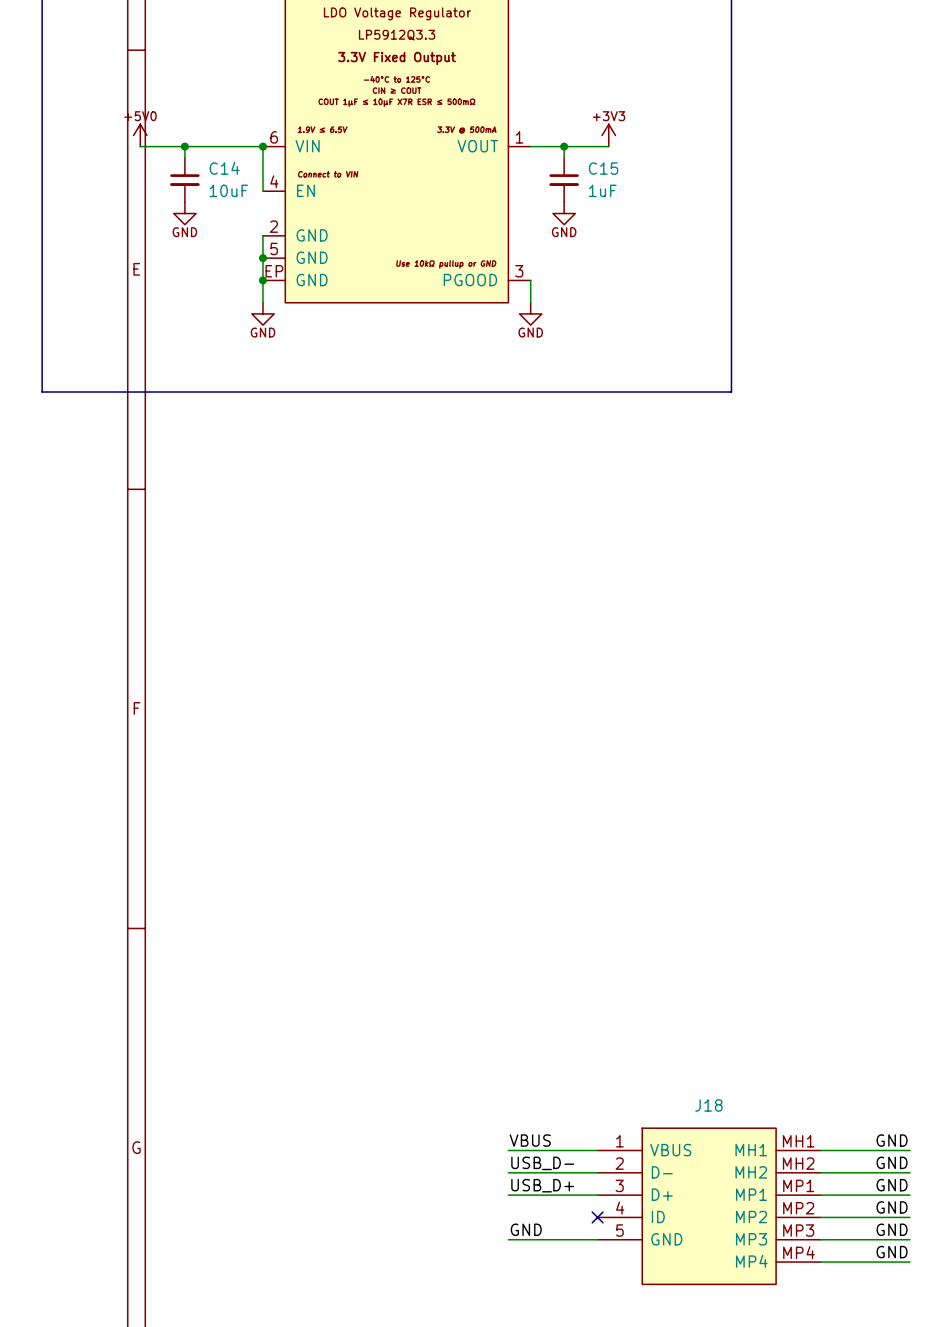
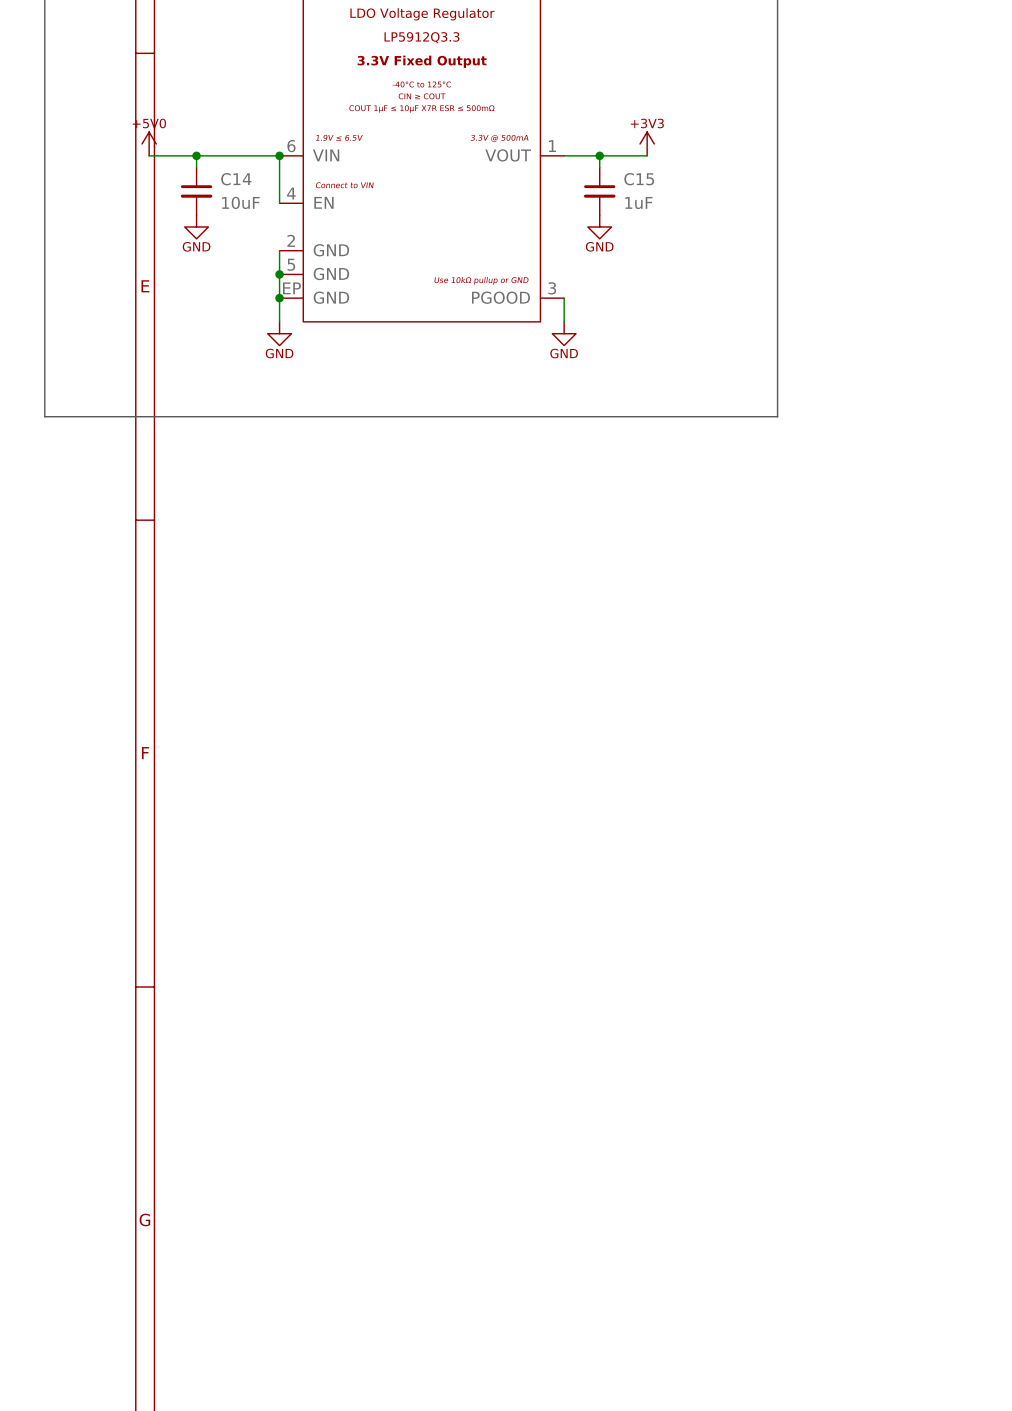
label: VBUS (530, 1140) -> none
label: GND (892, 1140) -> none
wire: (508, 1150) (597, 1150) -> none
wire: (820, 1150) (909, 1150) -> none
label: GND (892, 1162) -> none
label: USB_D- (542, 1163) -> none
wire: (508, 1172) (597, 1172) -> none
wire: (820, 1172) (909, 1172) -> none
label: USB_D+ (542, 1185) -> none
label: GND (892, 1185) -> none
wire: (508, 1195) (597, 1195) -> none
wire: (820, 1195) (909, 1195) -> none
J18: (709, 1206) -> none
label: GND (892, 1207) -> none
no-connect mark: (597, 1217) -> none
wire: (820, 1217) (909, 1217) -> none
label: GND (526, 1229) -> none
label: GND (892, 1229) -> none
wire: (508, 1239) (597, 1239) -> none
wire: (820, 1239) (909, 1239) -> none
label: GND (892, 1252) -> none
wire: (820, 1262) (909, 1262) -> none

